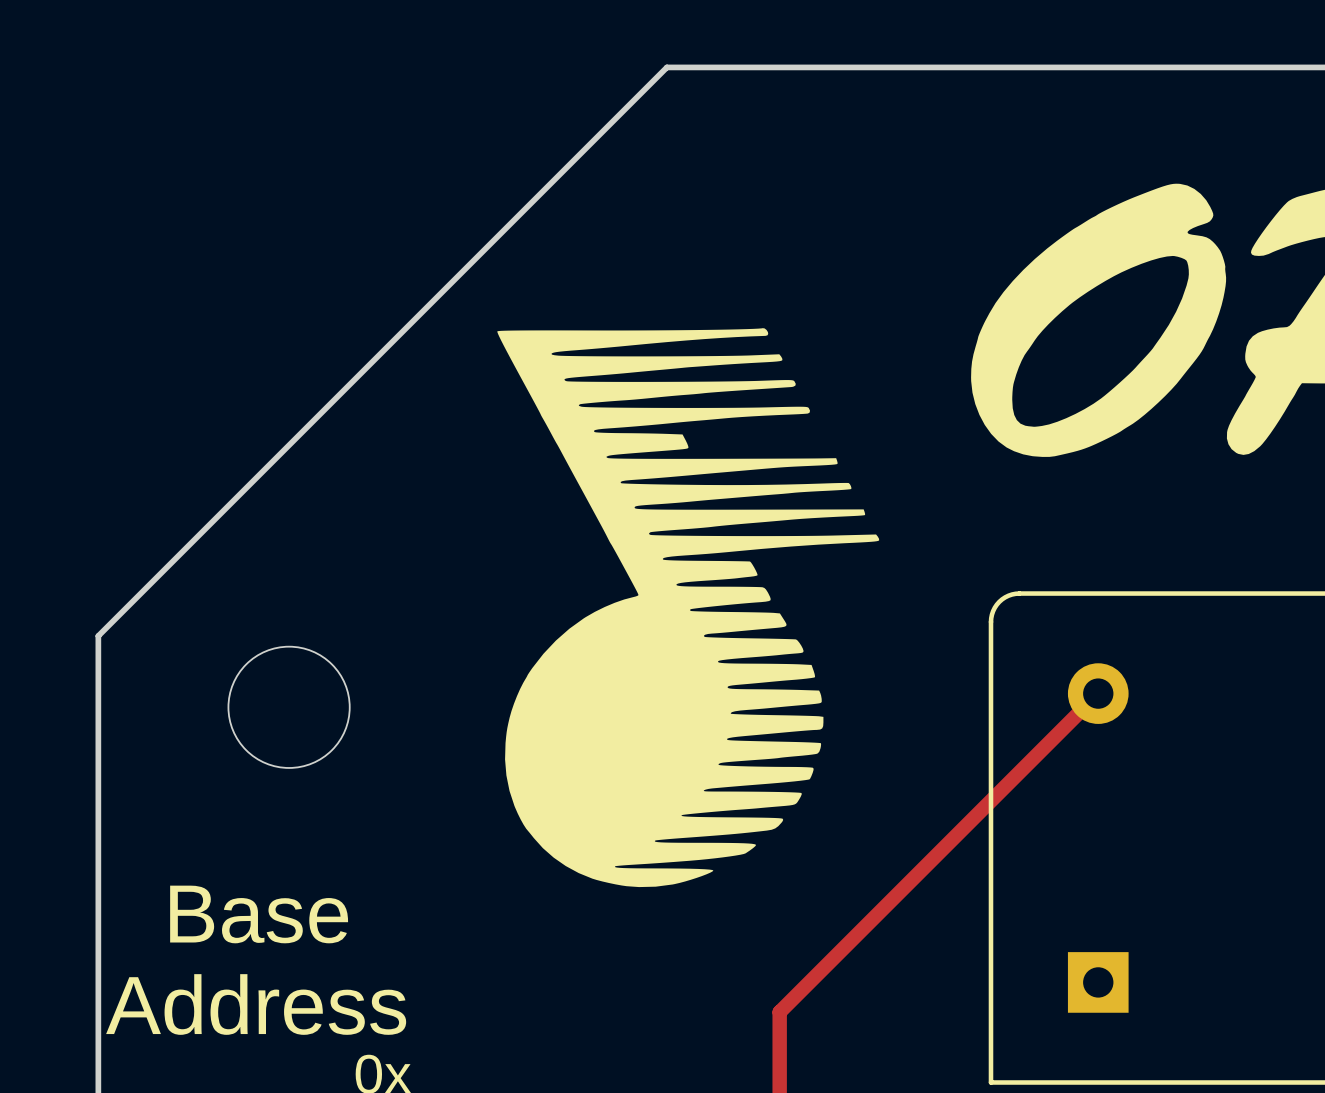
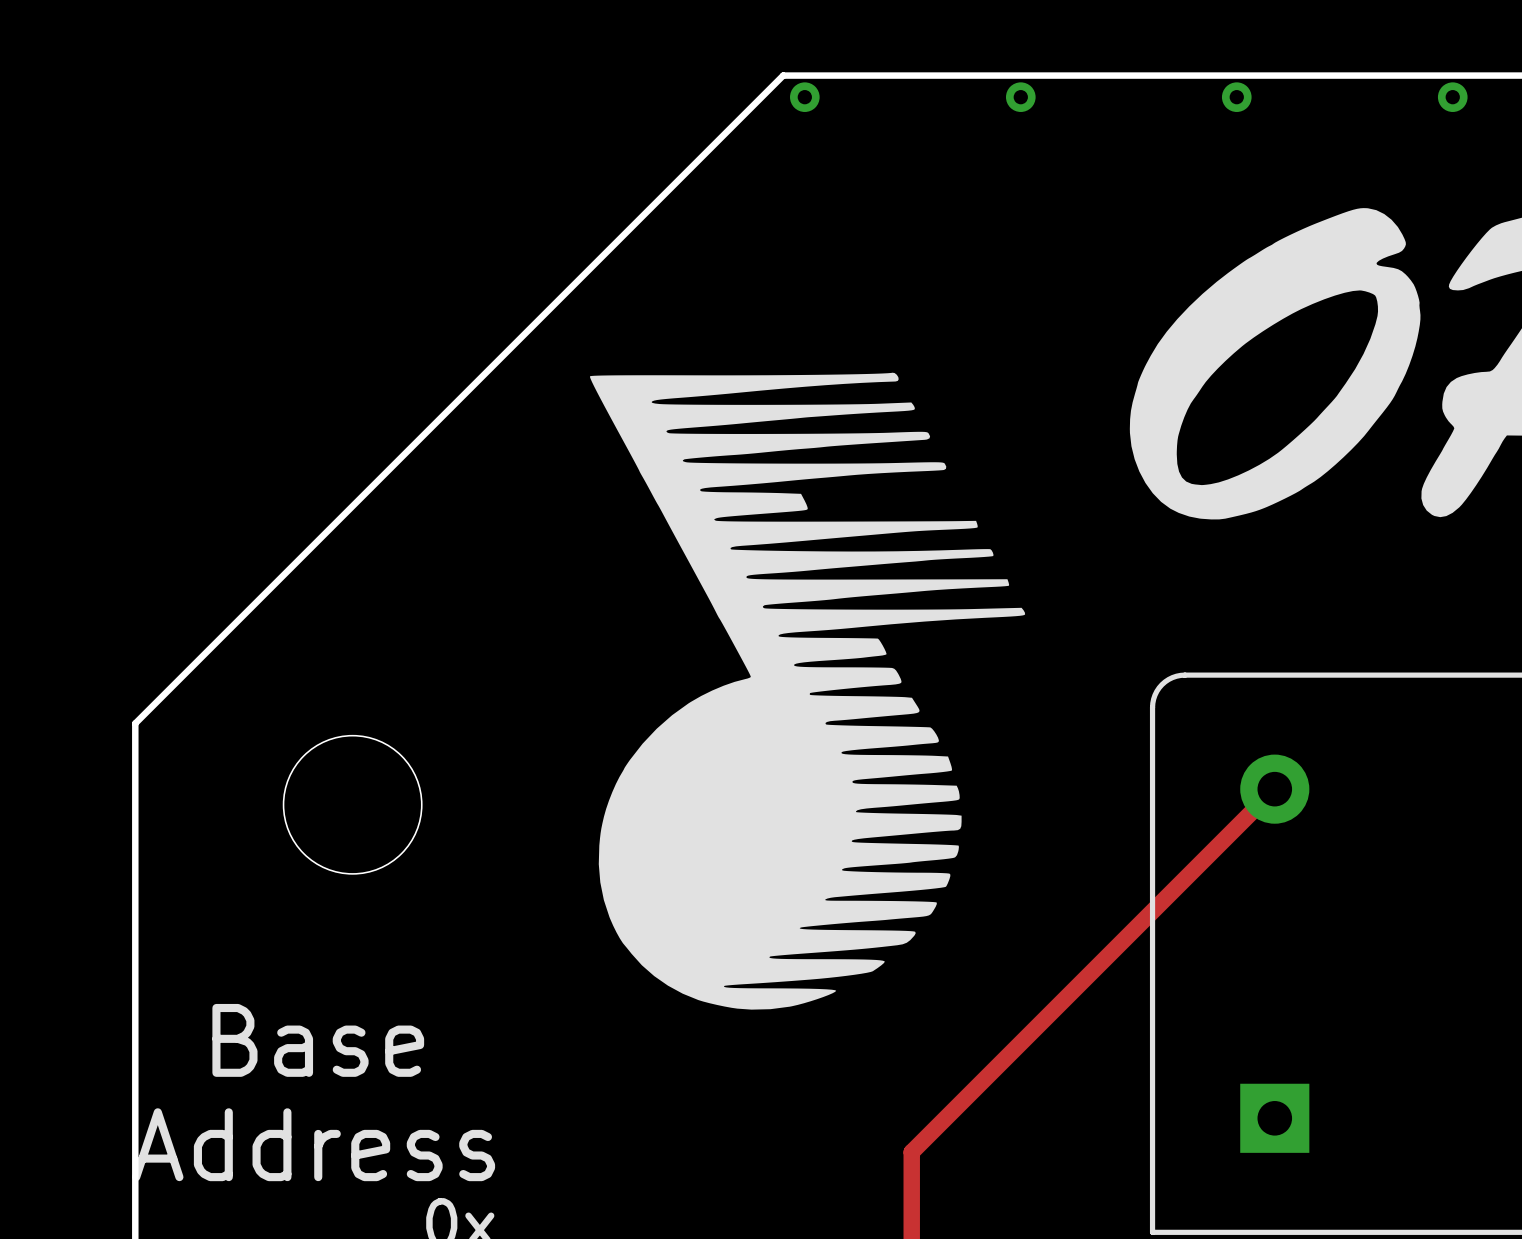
via: none -> (804, 97)
via: none -> (1020, 97)
via: none -> (1236, 97)
via: none -> (1452, 97)

